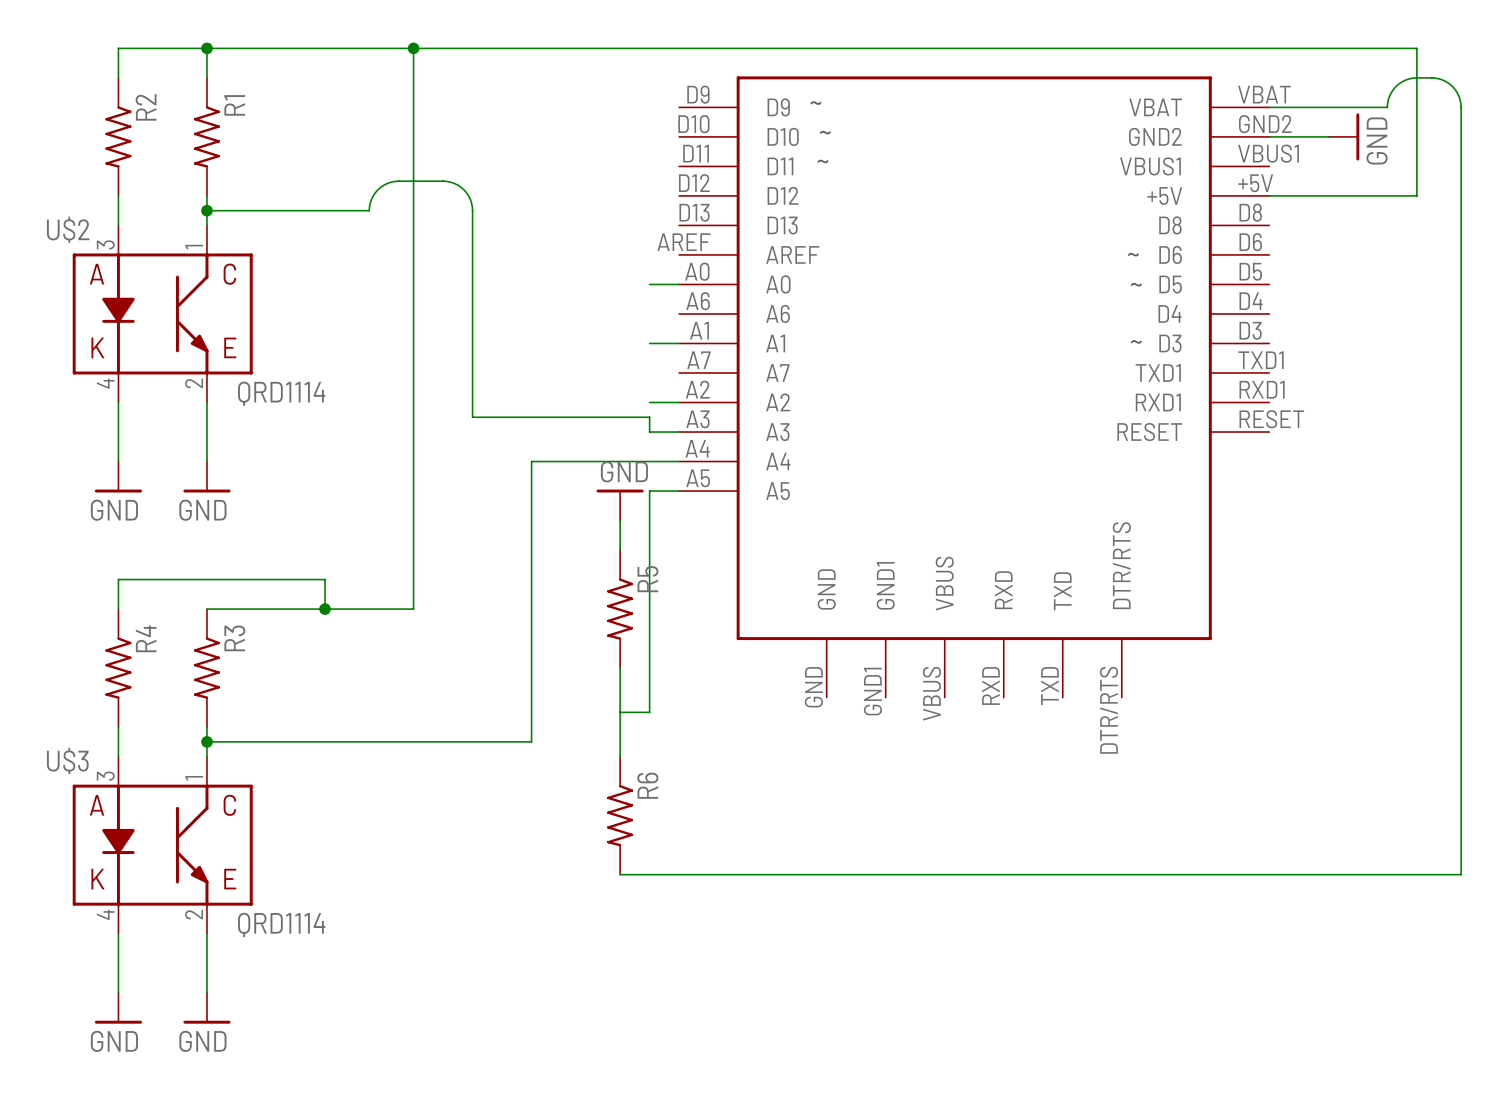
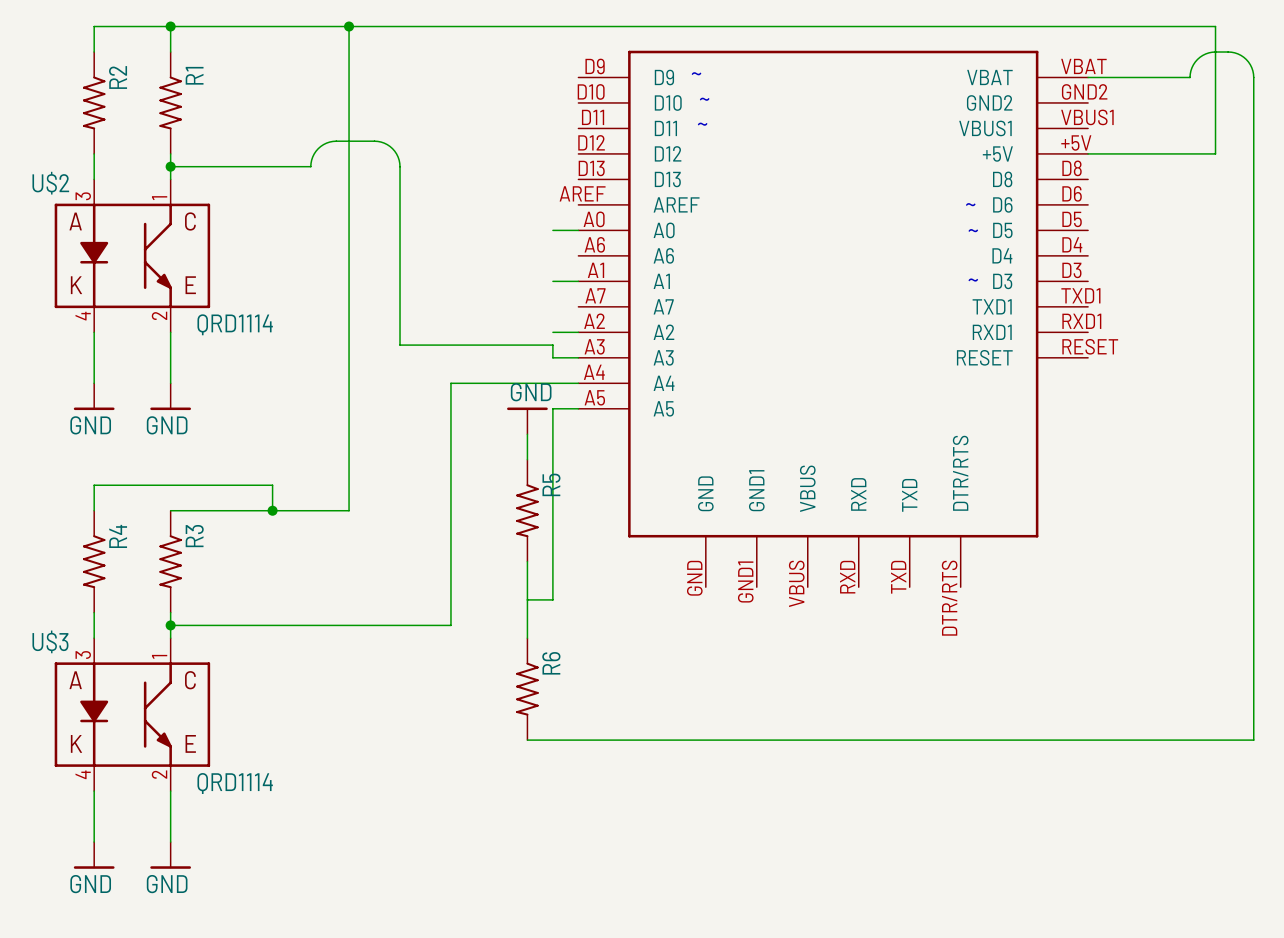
wire: (1269, 136) (1328, 136) -> none
power symbol: GND (1343, 136) -> none

